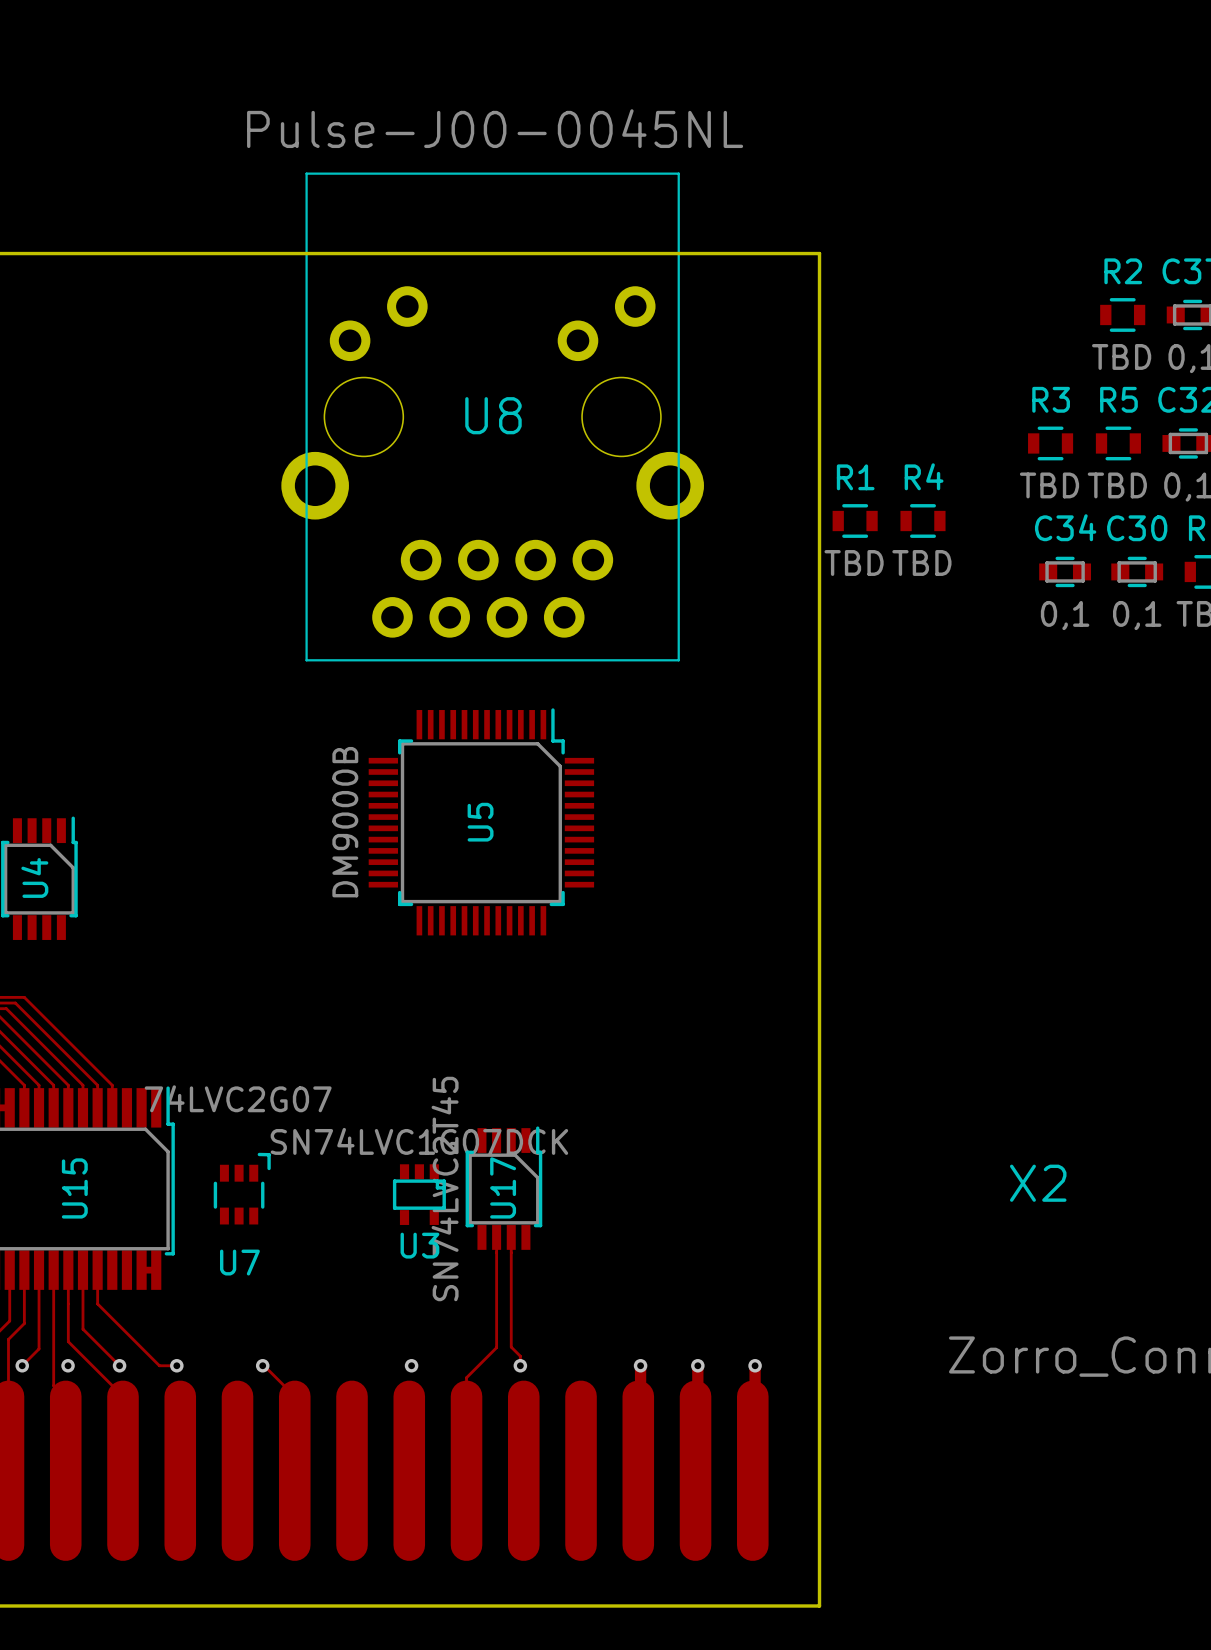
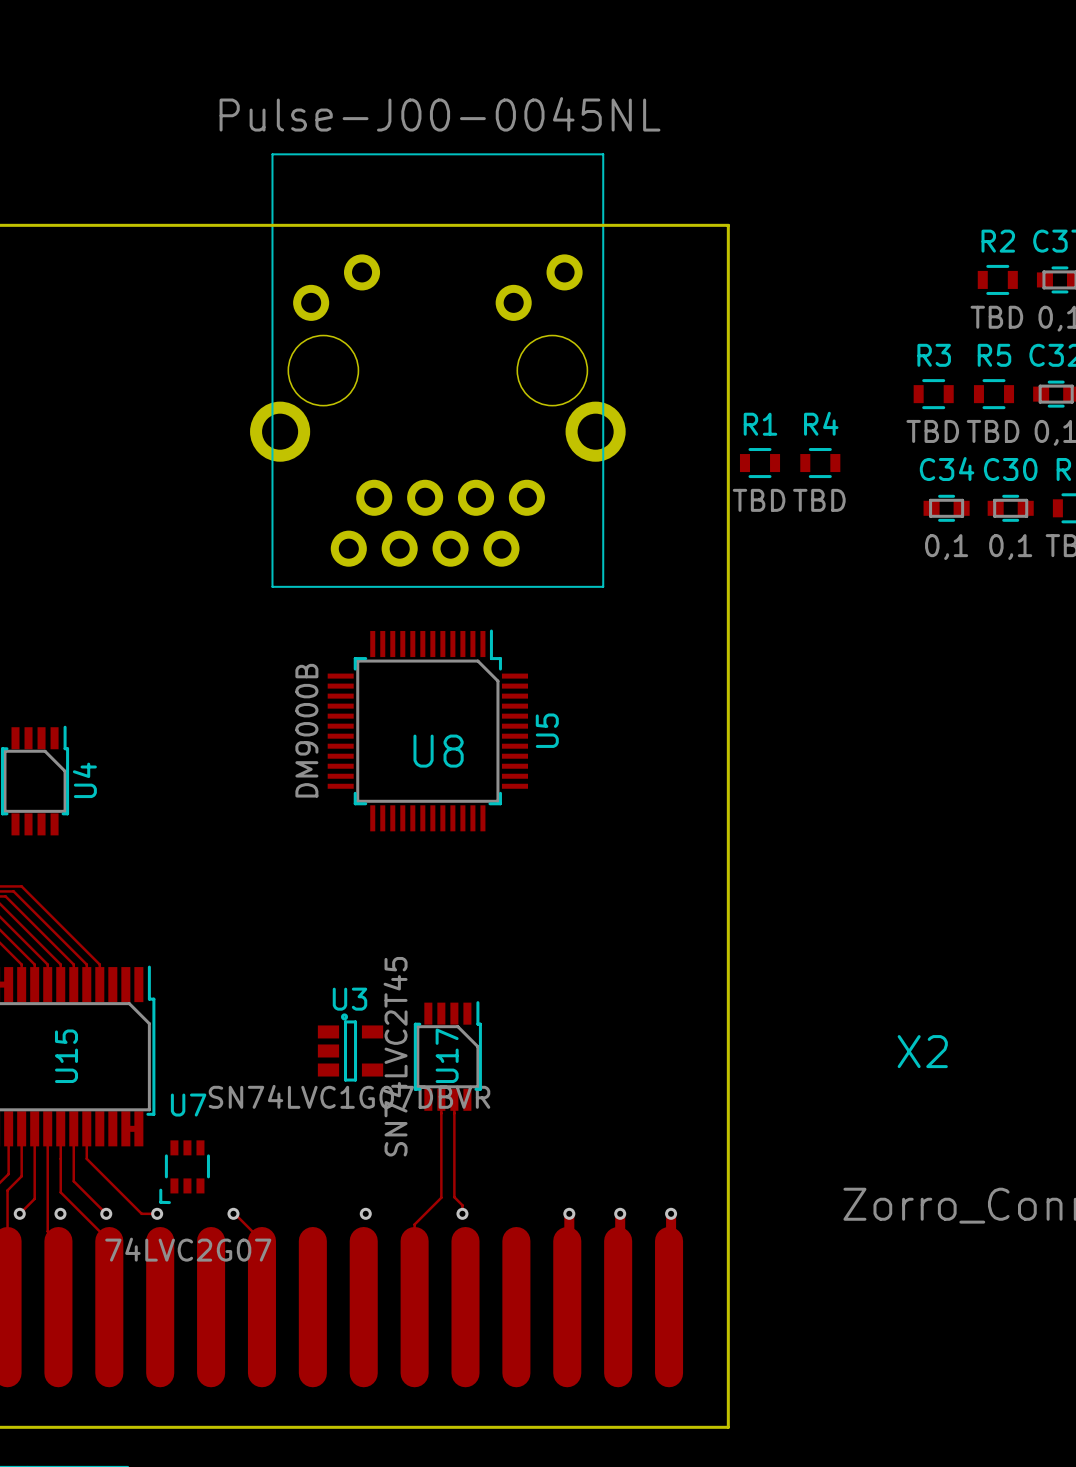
U8 name position: U8 (493, 415) -> U8 (438, 751)
U5 name position: U5 (480, 822) -> U5 (547, 730)
U4 name position: U4 (34, 877) -> U4 (84, 780)
U3 value: SN74LVC1G07DCK (419, 1141) -> SN74LVC1G07DBVR (349, 1096)
U3 footprint: [392, 1164, 446, 1225] -> [317, 1013, 384, 1082]
U7 rotation: 0° (242, 1188) -> 180° (184, 1172)
U7 position: (242, 1188) -> (184, 1172)
U3 name position: U3 (419, 1245) -> U3 (349, 999)

